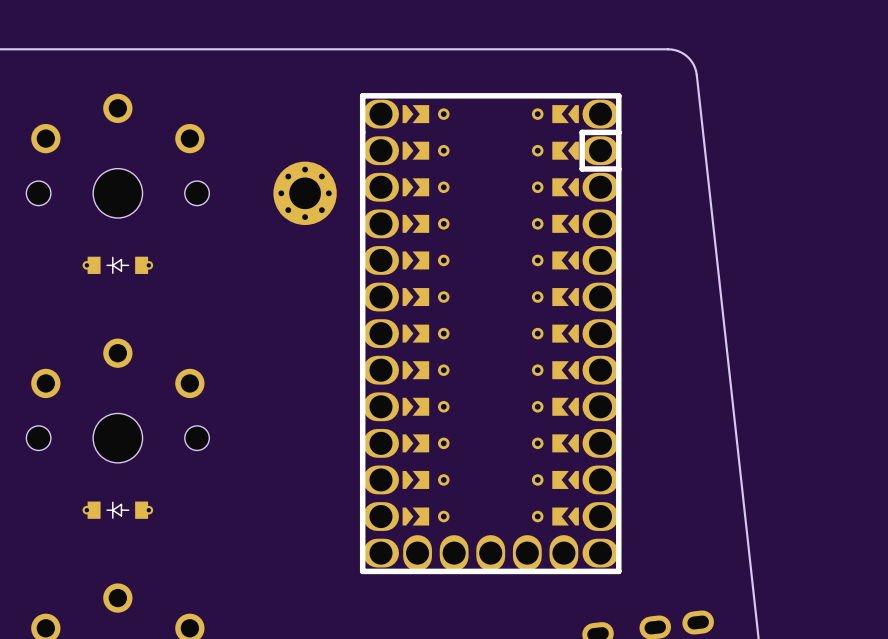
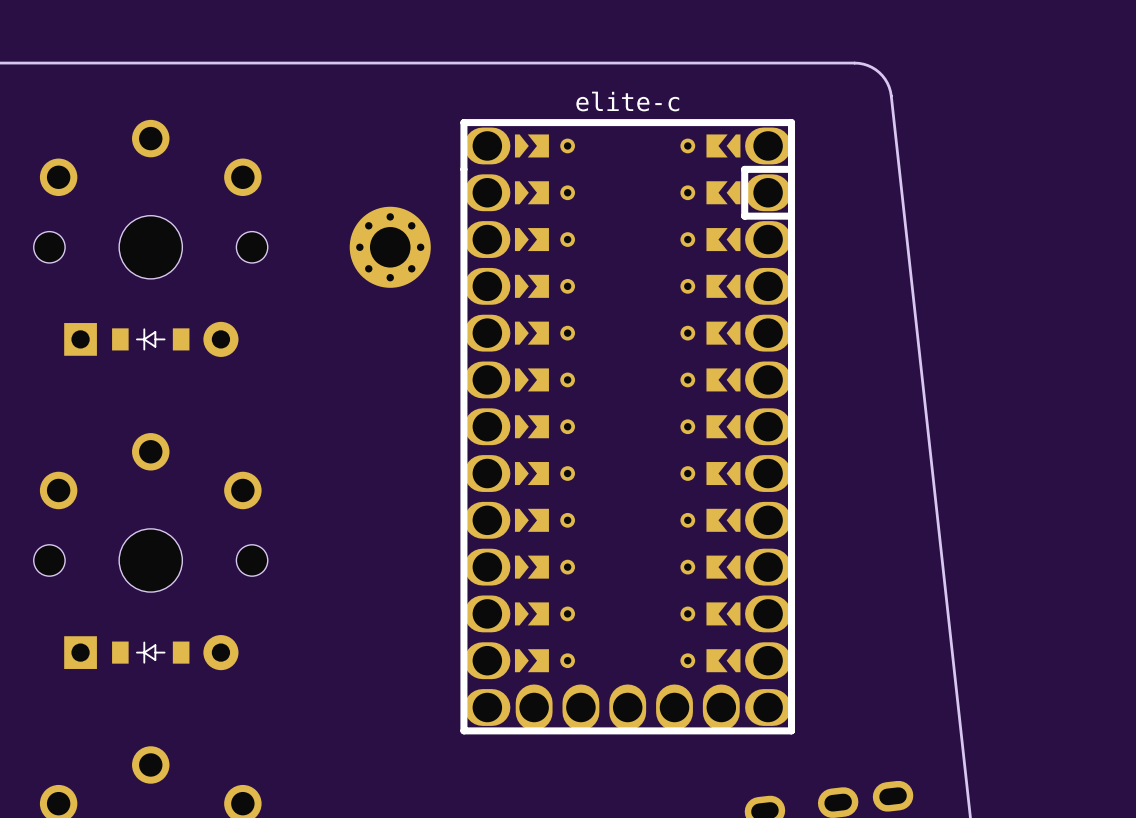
part text: none -> elite-c (627, 101)
part footprint: [87, 256, 149, 274] -> [64, 321, 239, 357]
part: (86, 265) -> none
part: (148, 265) -> none
part footprint: [87, 501, 149, 519] -> [64, 635, 239, 671]
part: (86, 510) -> none
part: (148, 510) -> none

